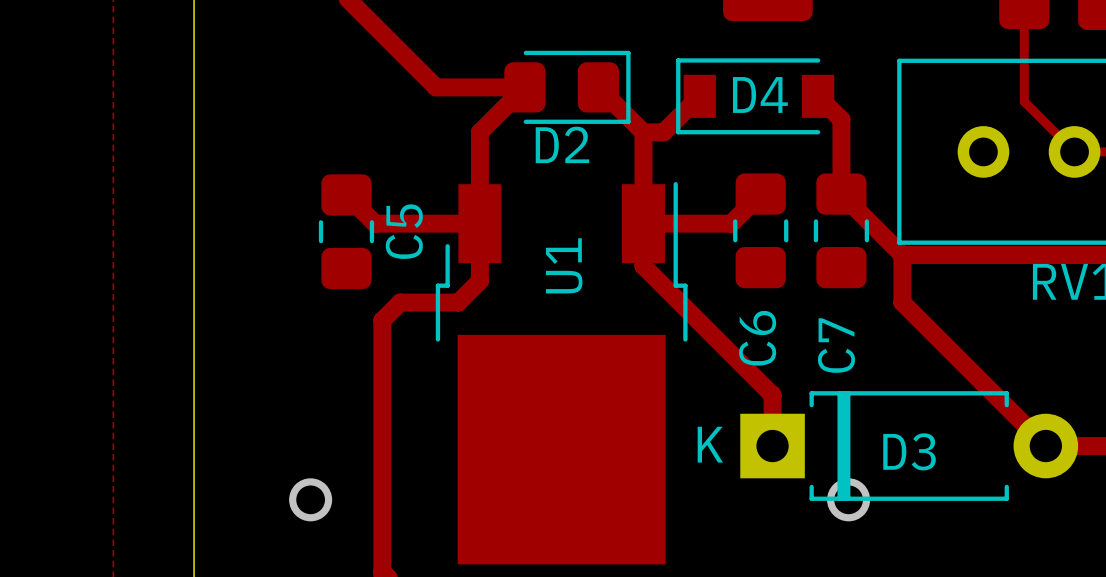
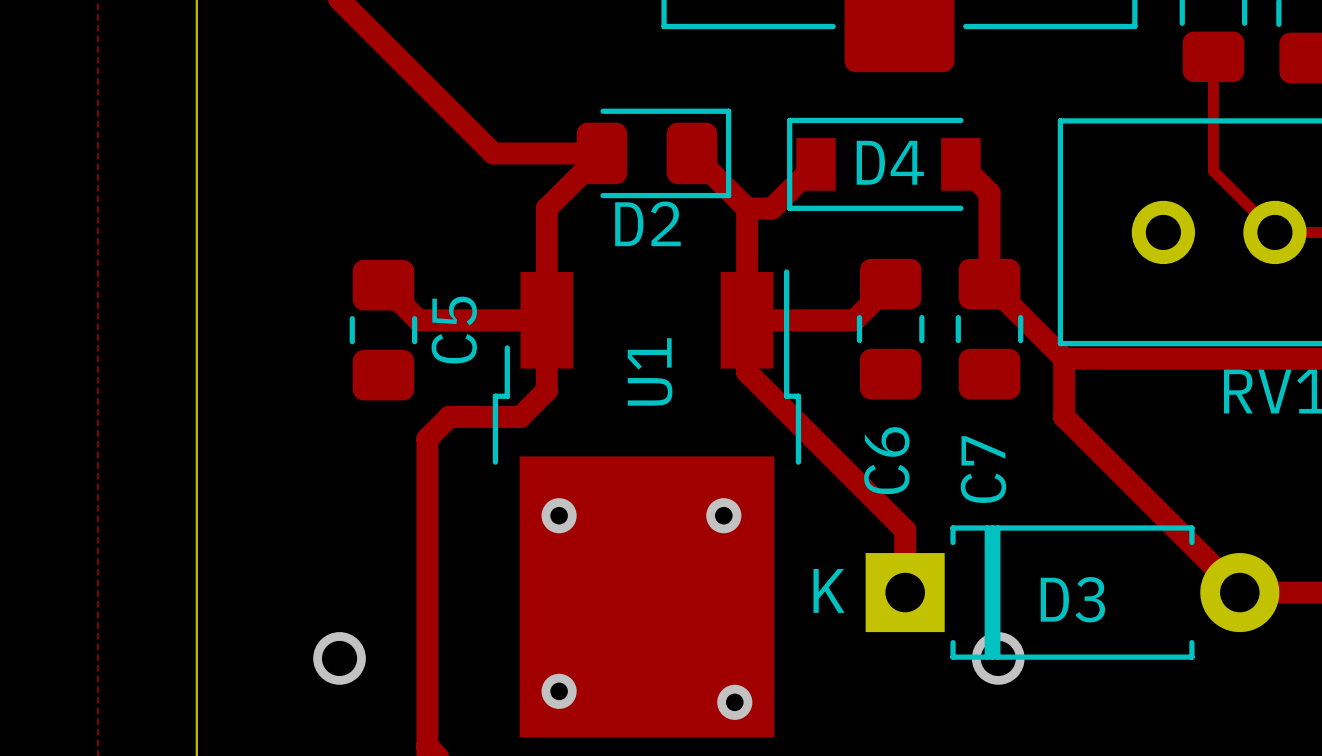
via: none -> (559, 515)
via: none -> (723, 515)
via: none -> (559, 691)
via: none -> (734, 702)

